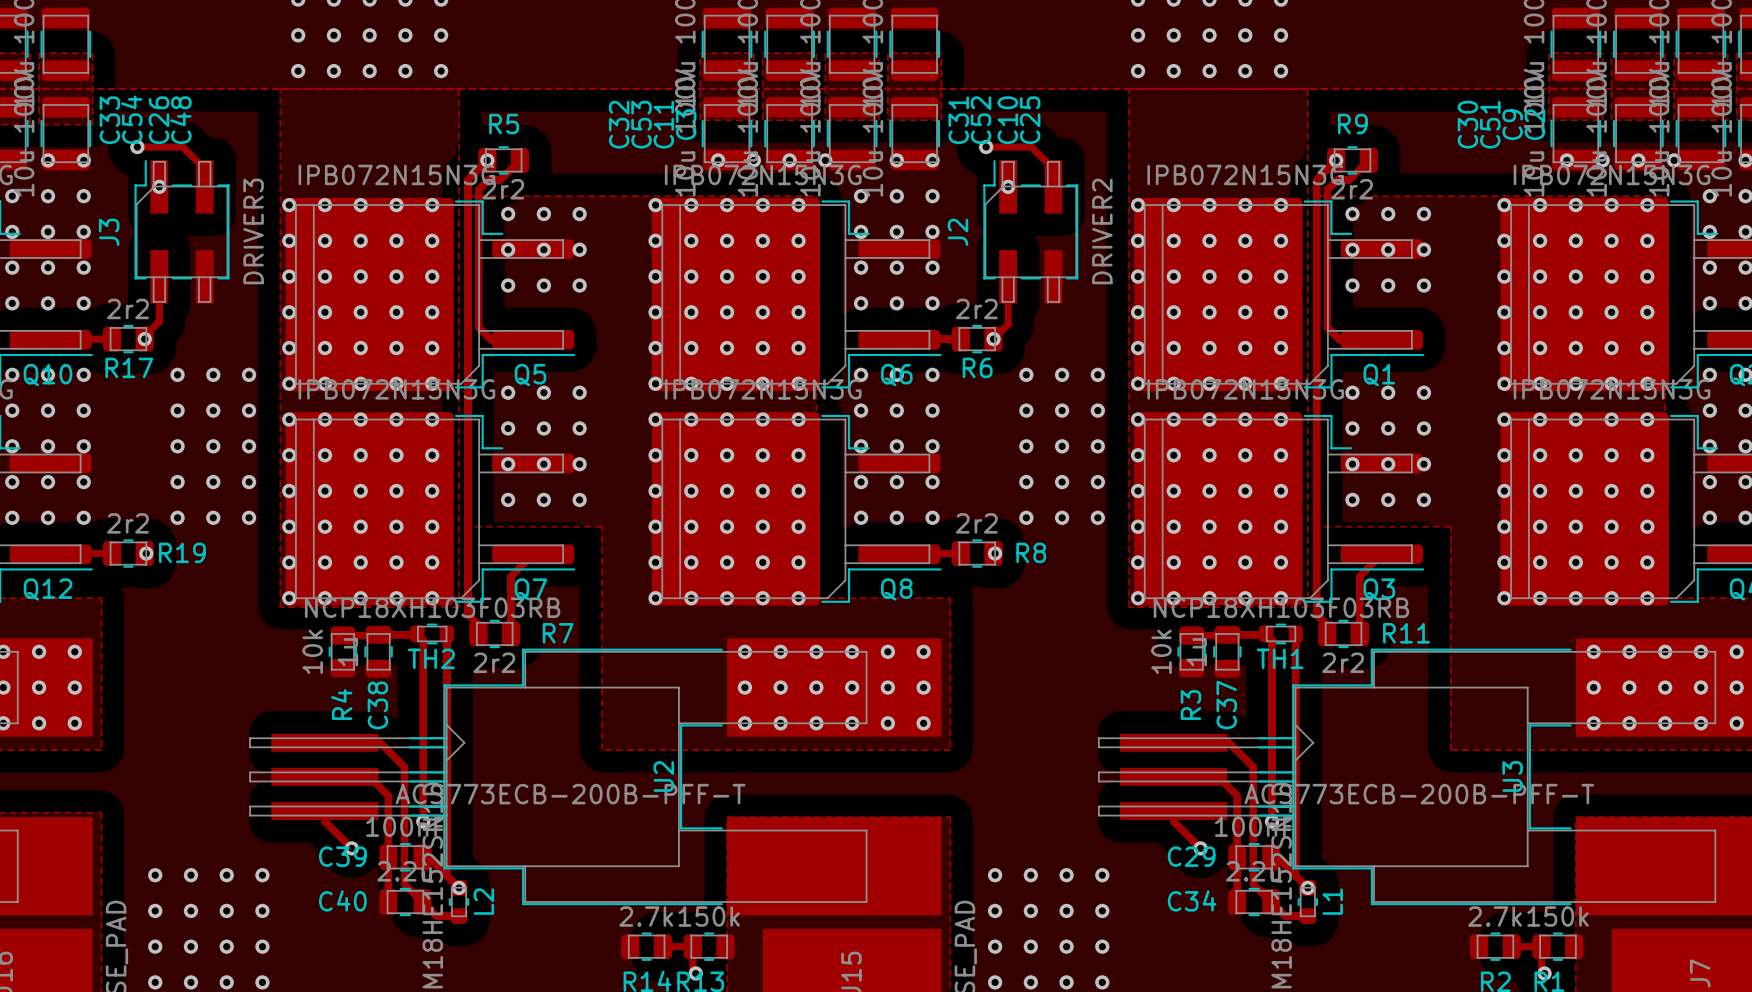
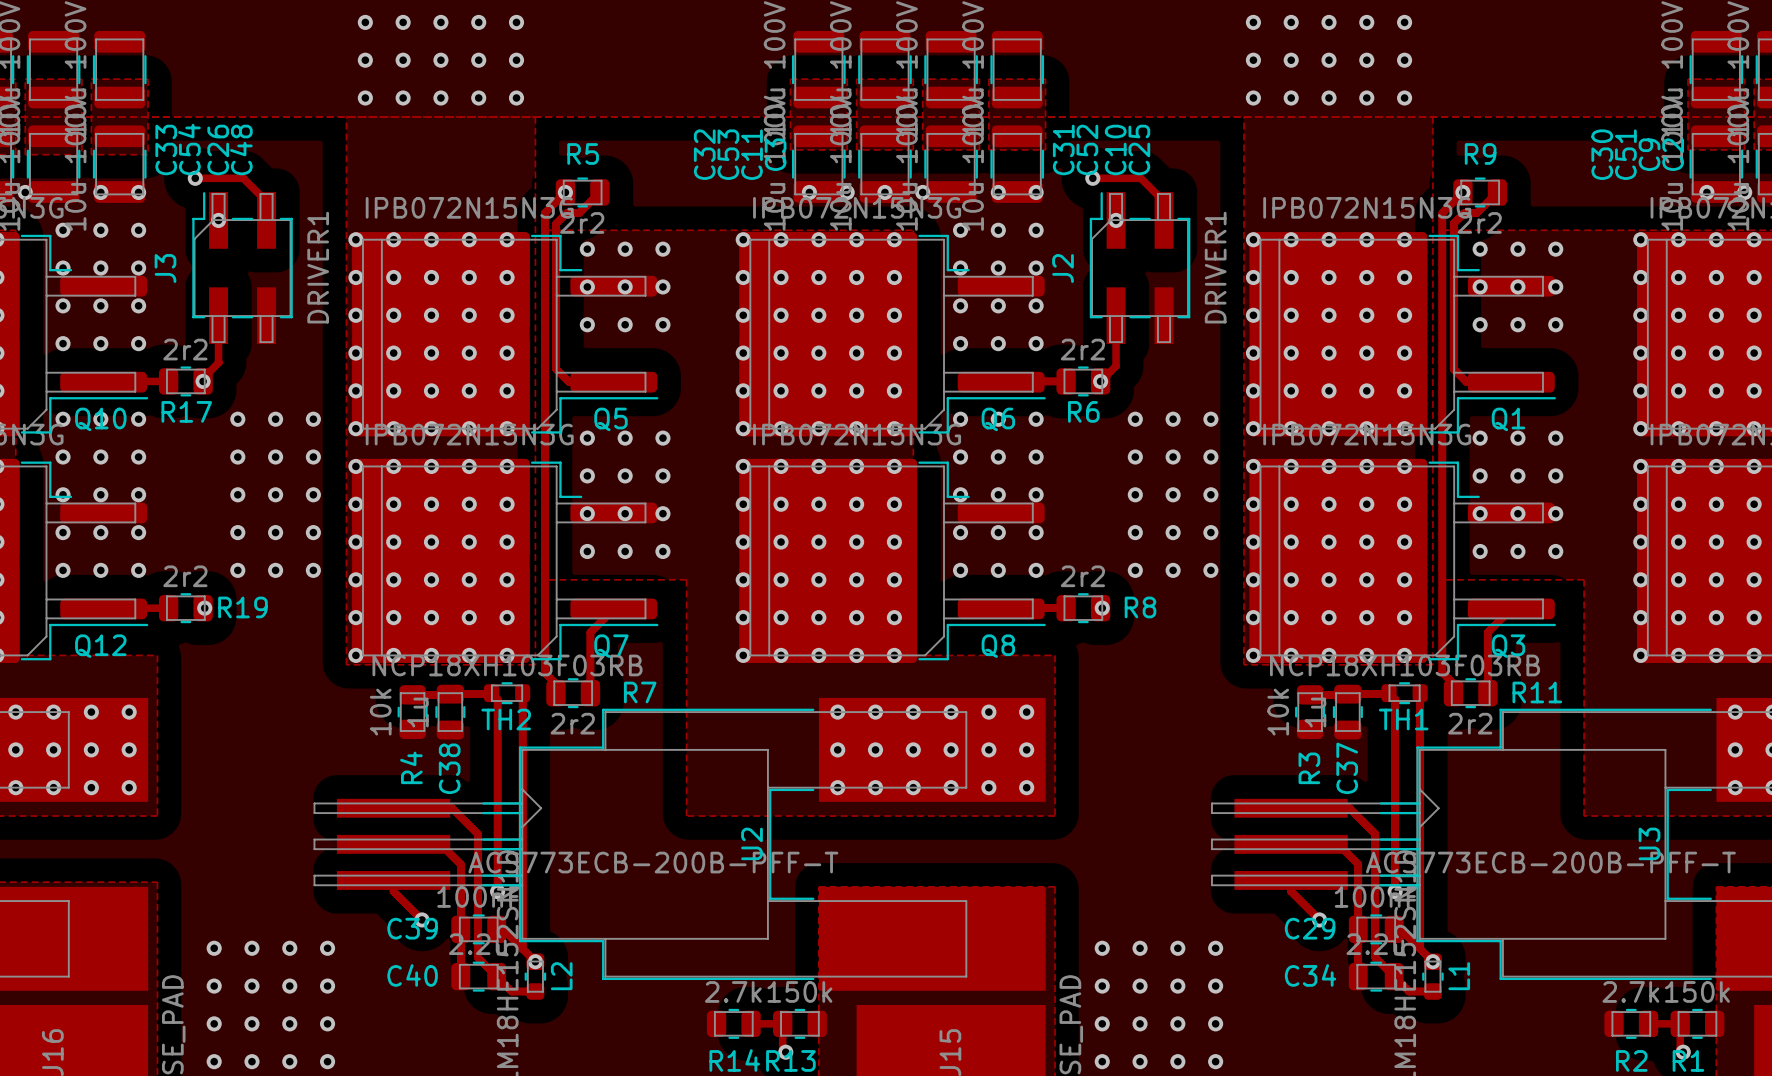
J3 value: DRIVER3 (253, 231) -> DRIVER1 (318, 267)
J2 value: DRIVER2 (1102, 231) -> DRIVER1 (1215, 267)

